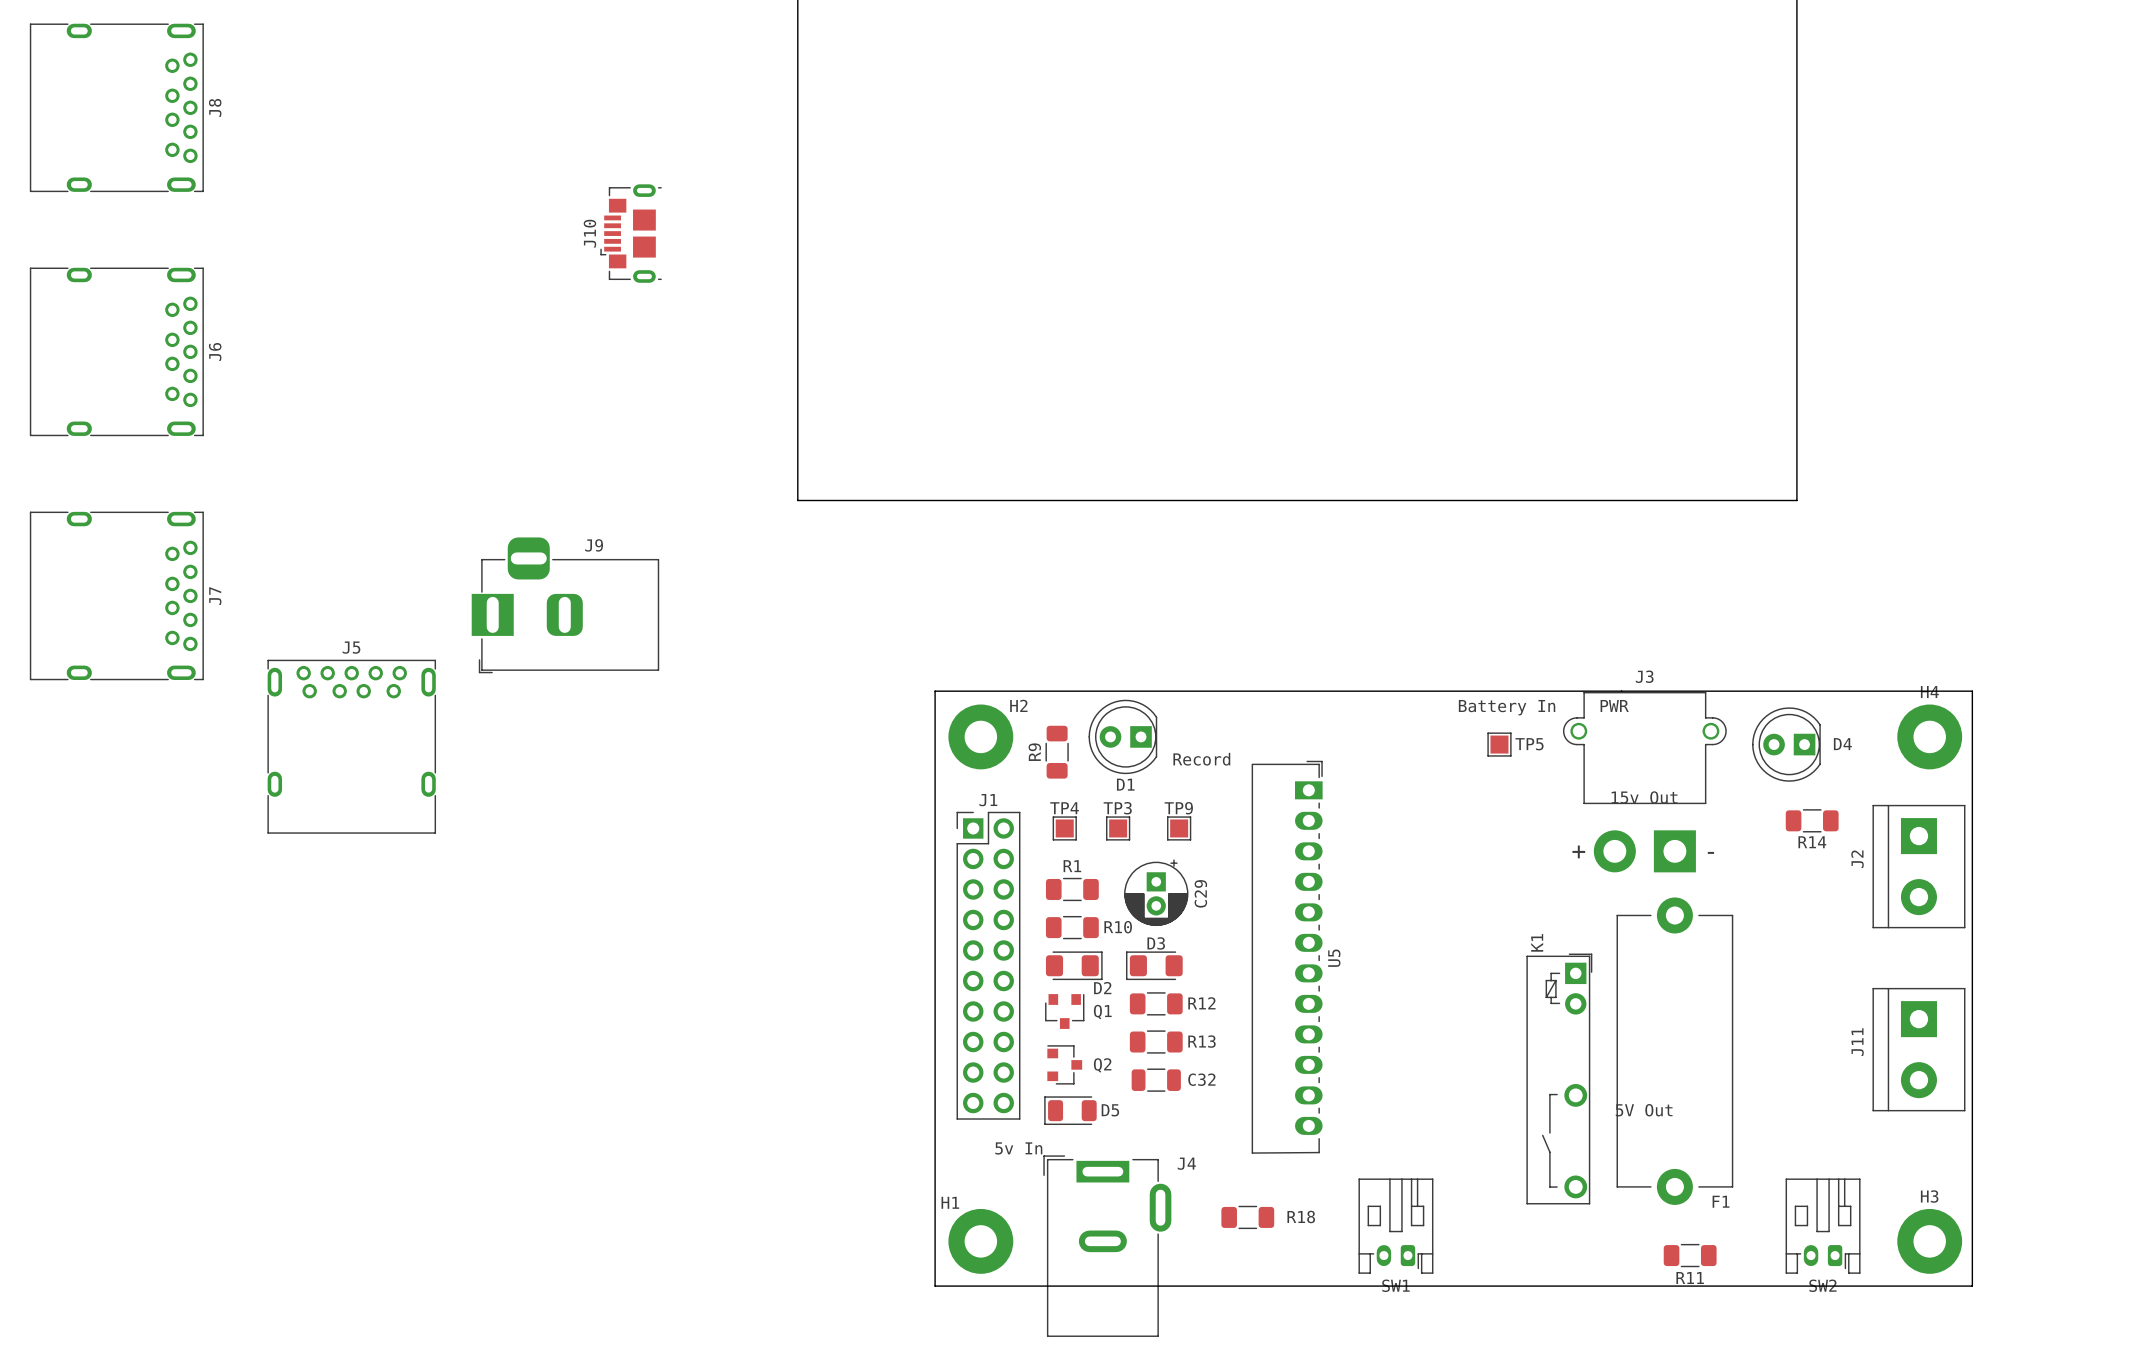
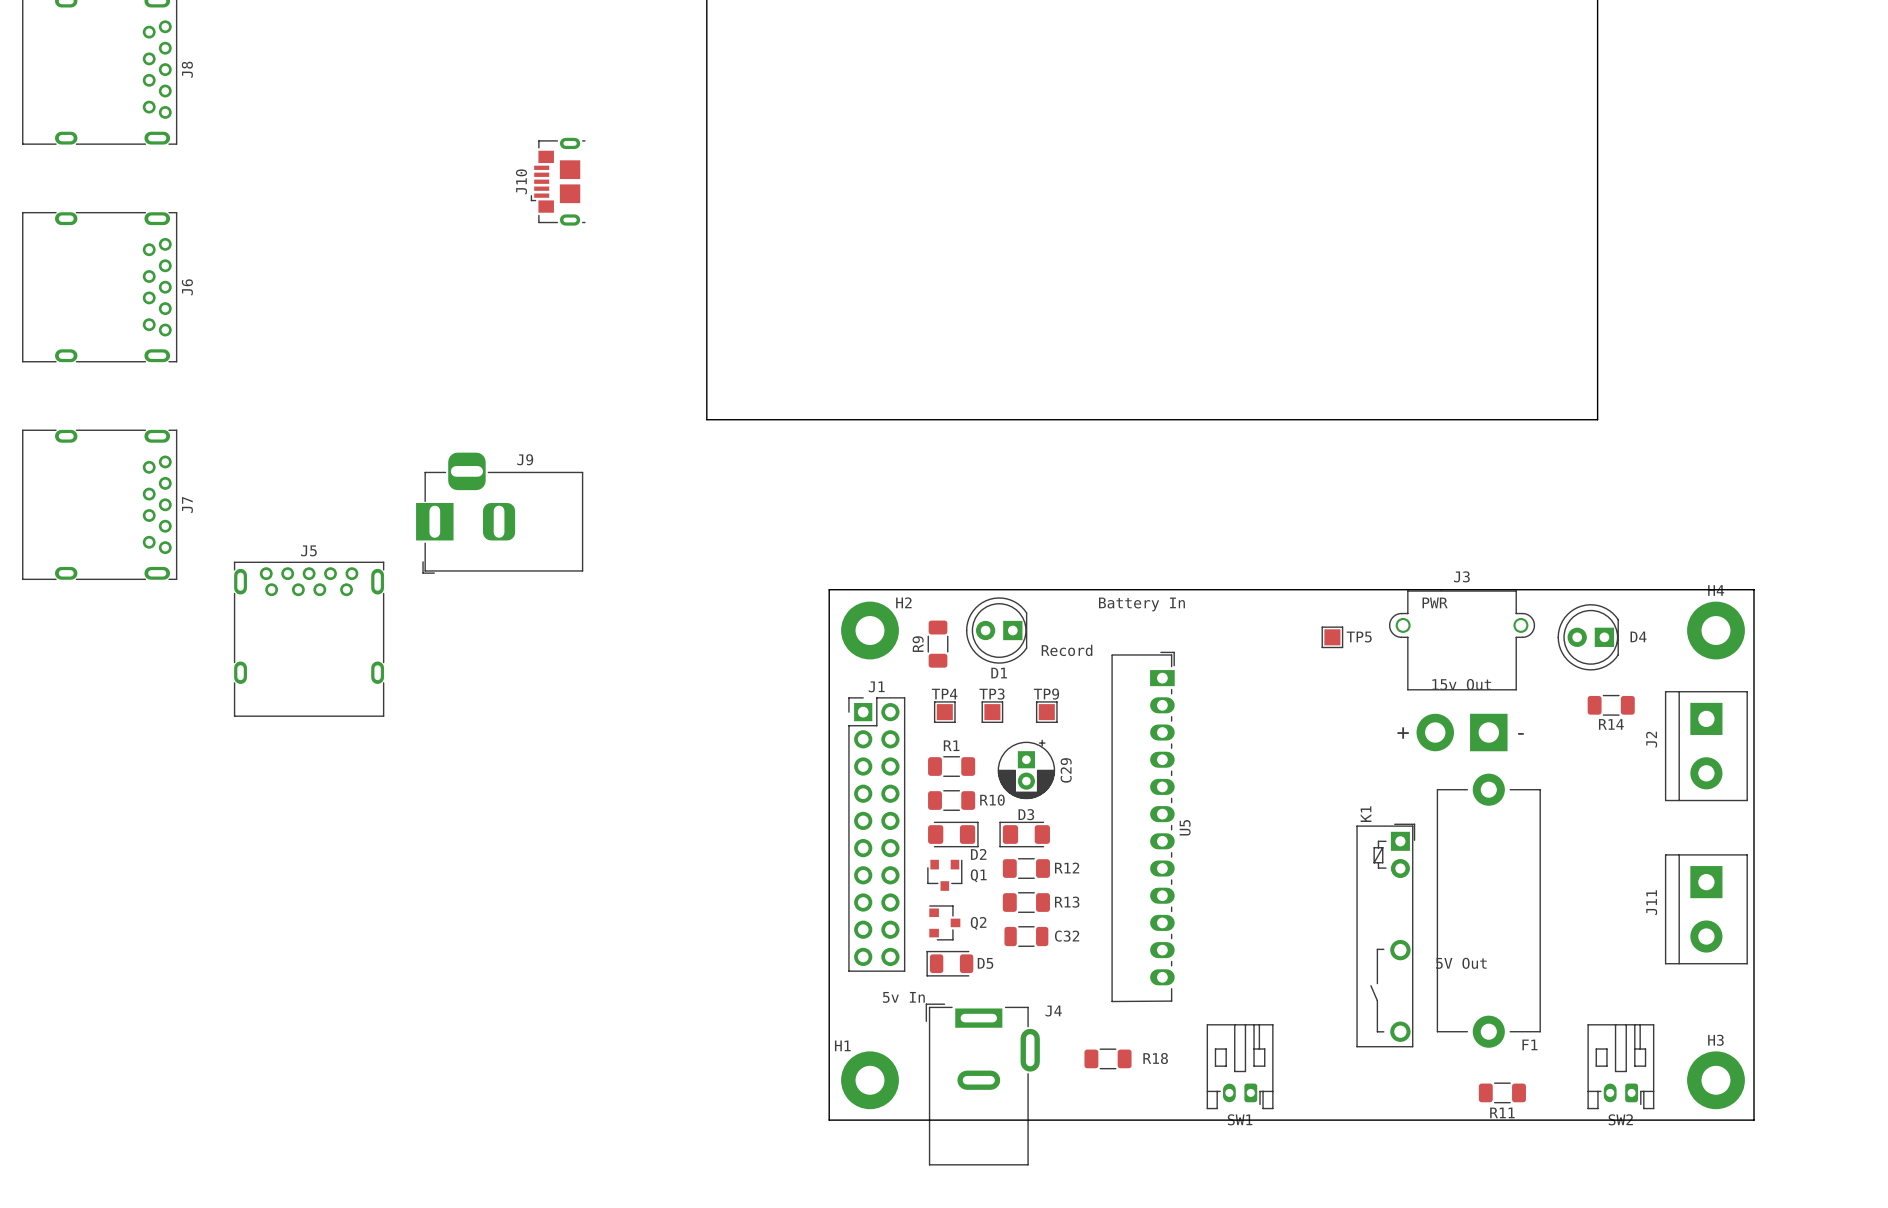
text position: Battery In (1507, 707) -> Battery In (1141, 604)

